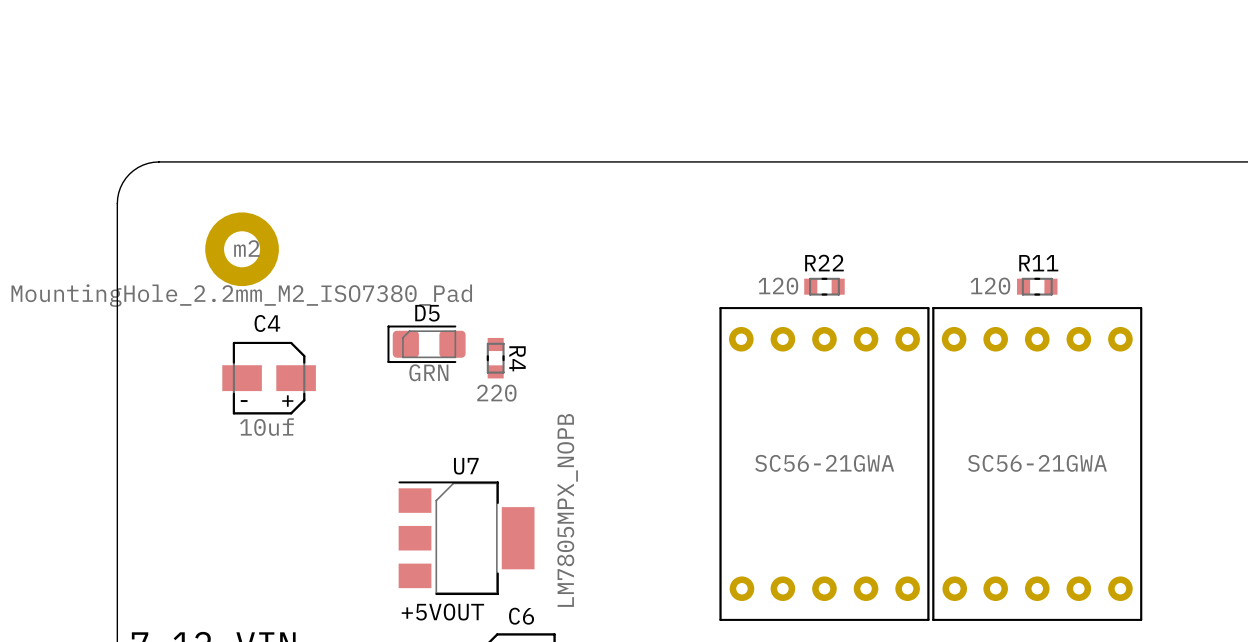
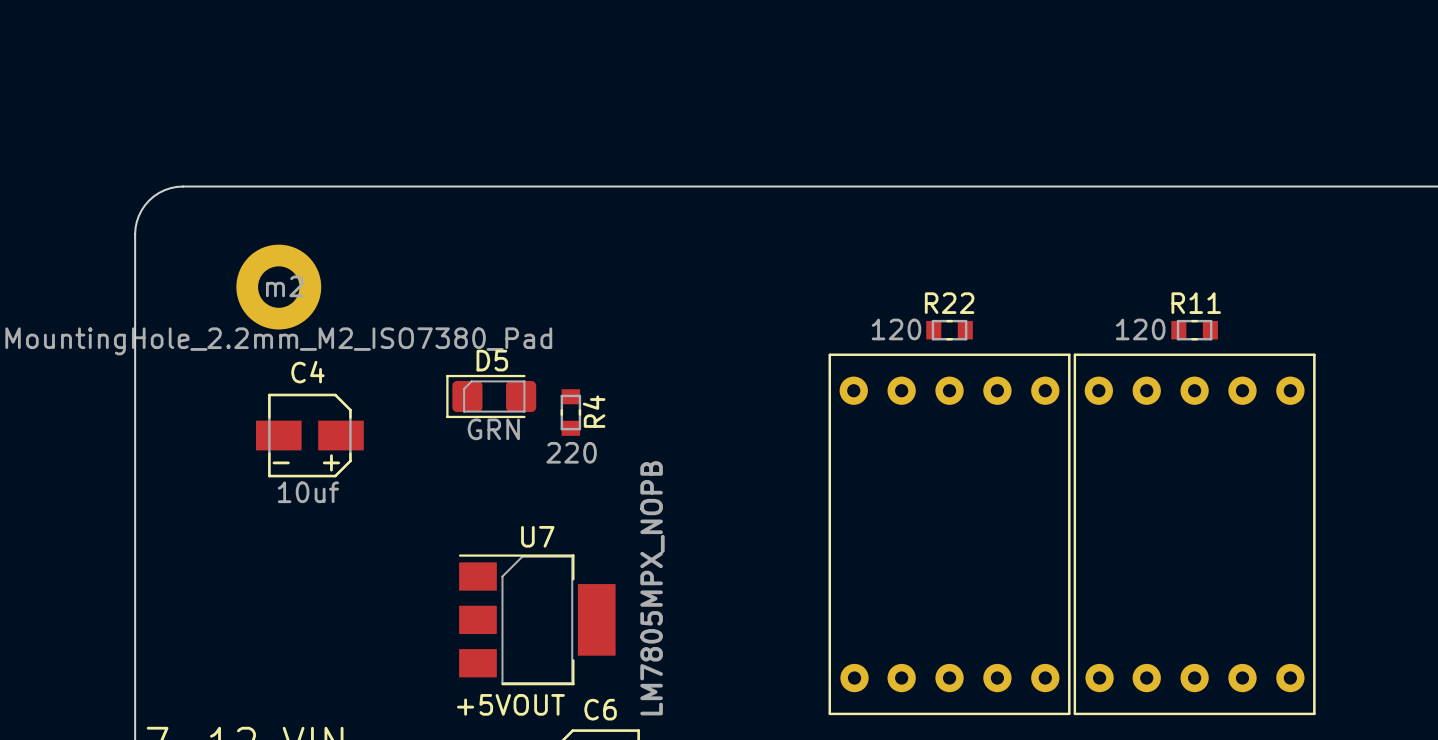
R4 name rotation: 0° (517, 358) -> 180° (594, 411)
part value: SC56-21GWA (824, 463) -> none
part value: SC56-21GWA (1037, 463) -> none

